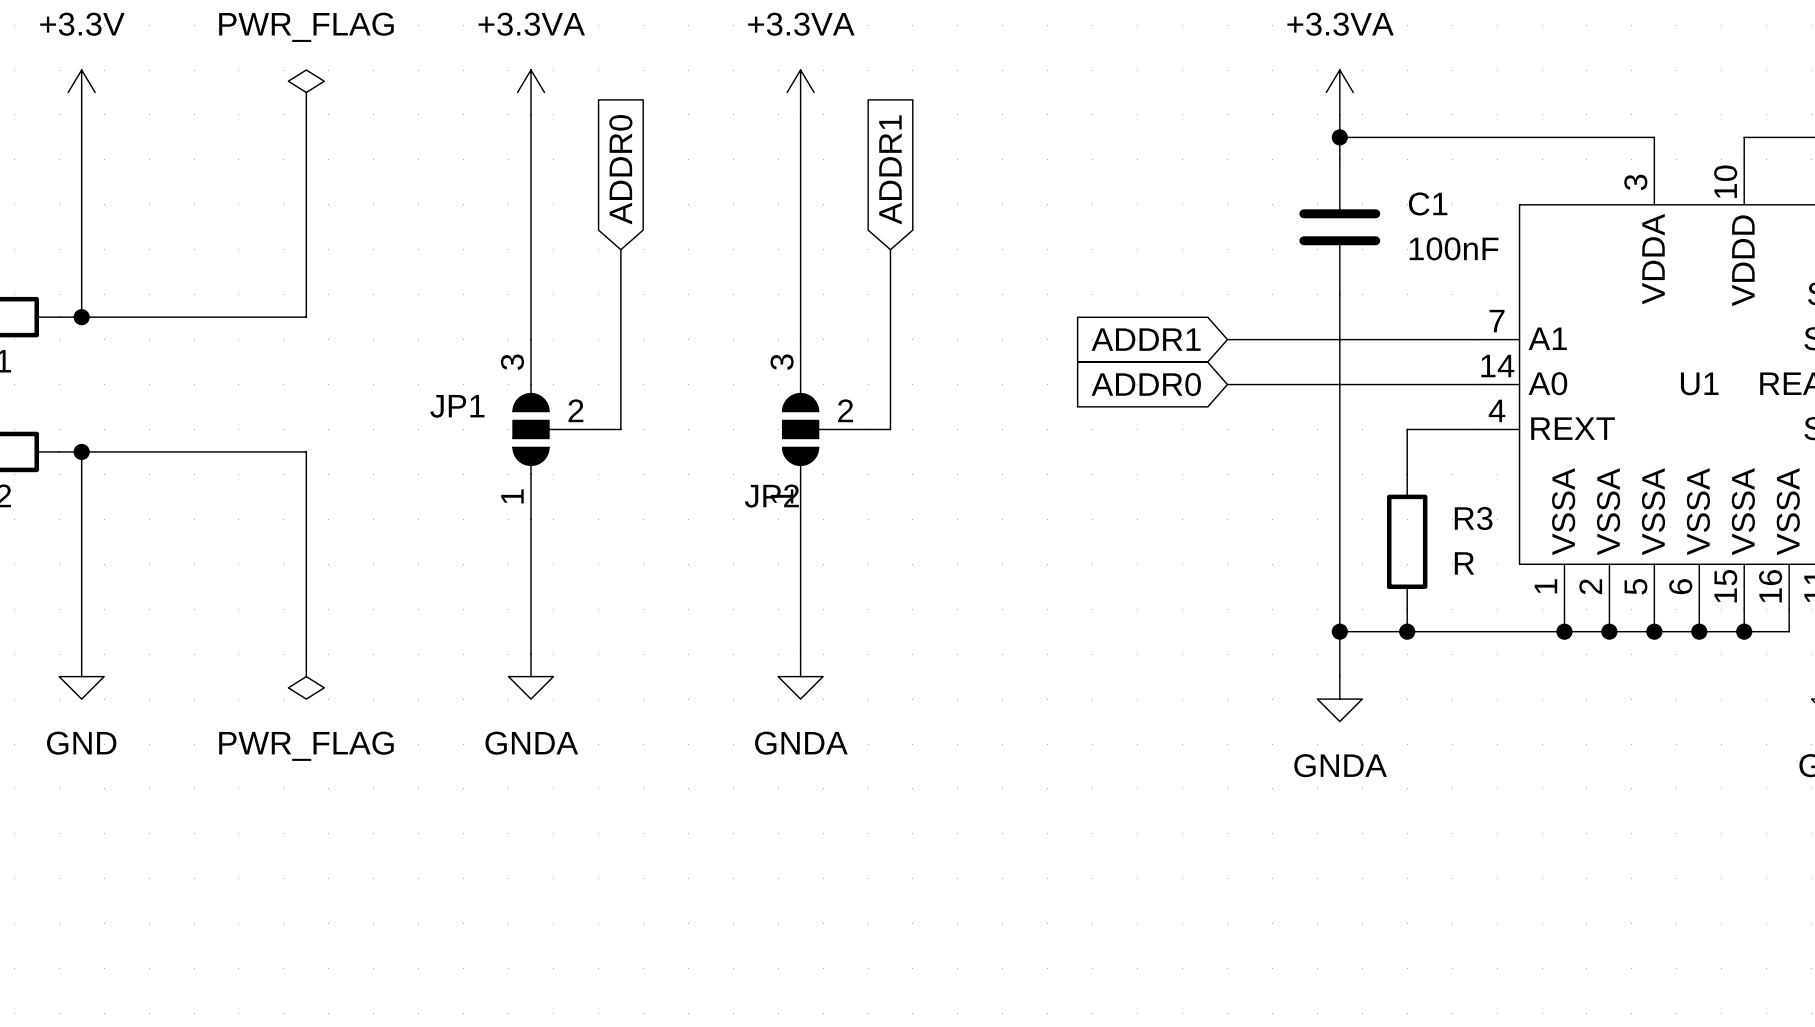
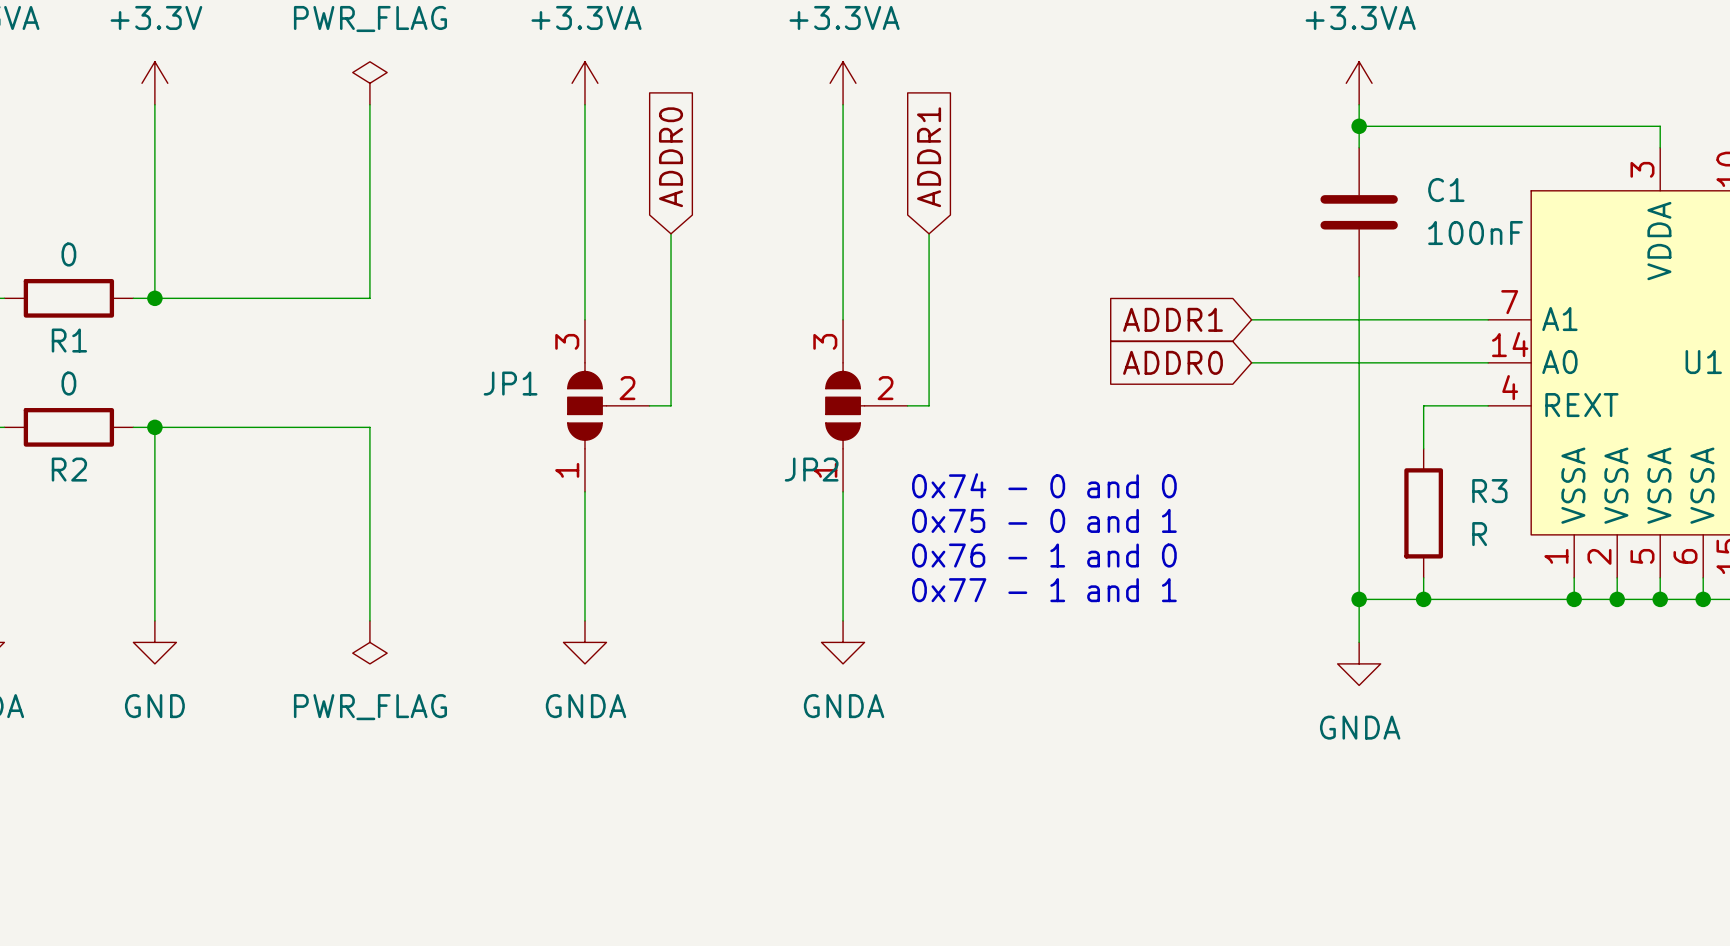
text: none -> 0x74 - 0 and 0 (1044, 485)
text: none -> 0x75 - 0 and 1 (1044, 520)
text: none -> 0x76 - 1 and 0 (1044, 555)
text: none -> 0x77 - 1 and 1 (1044, 590)

